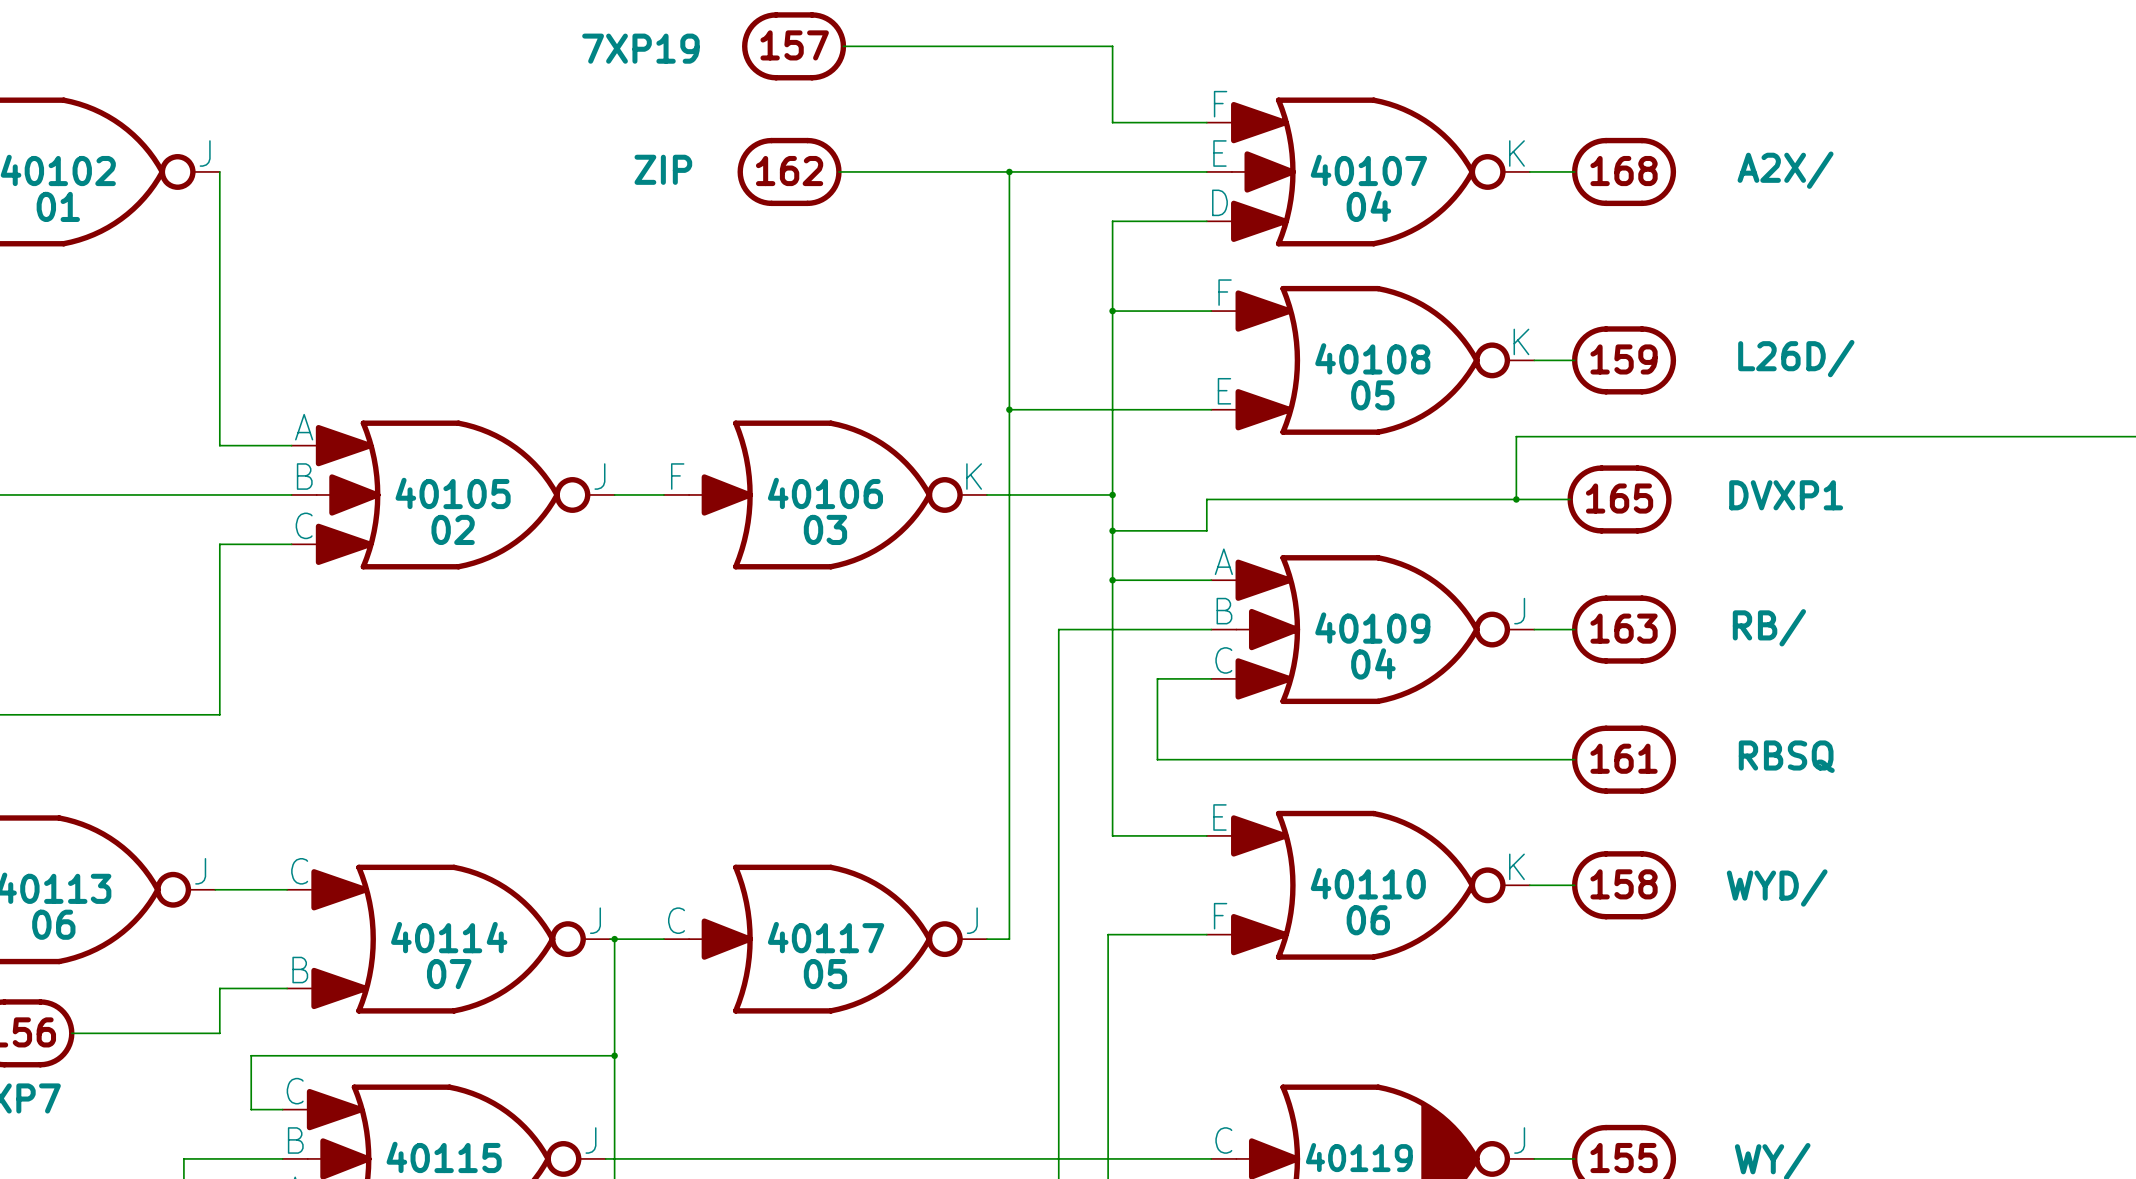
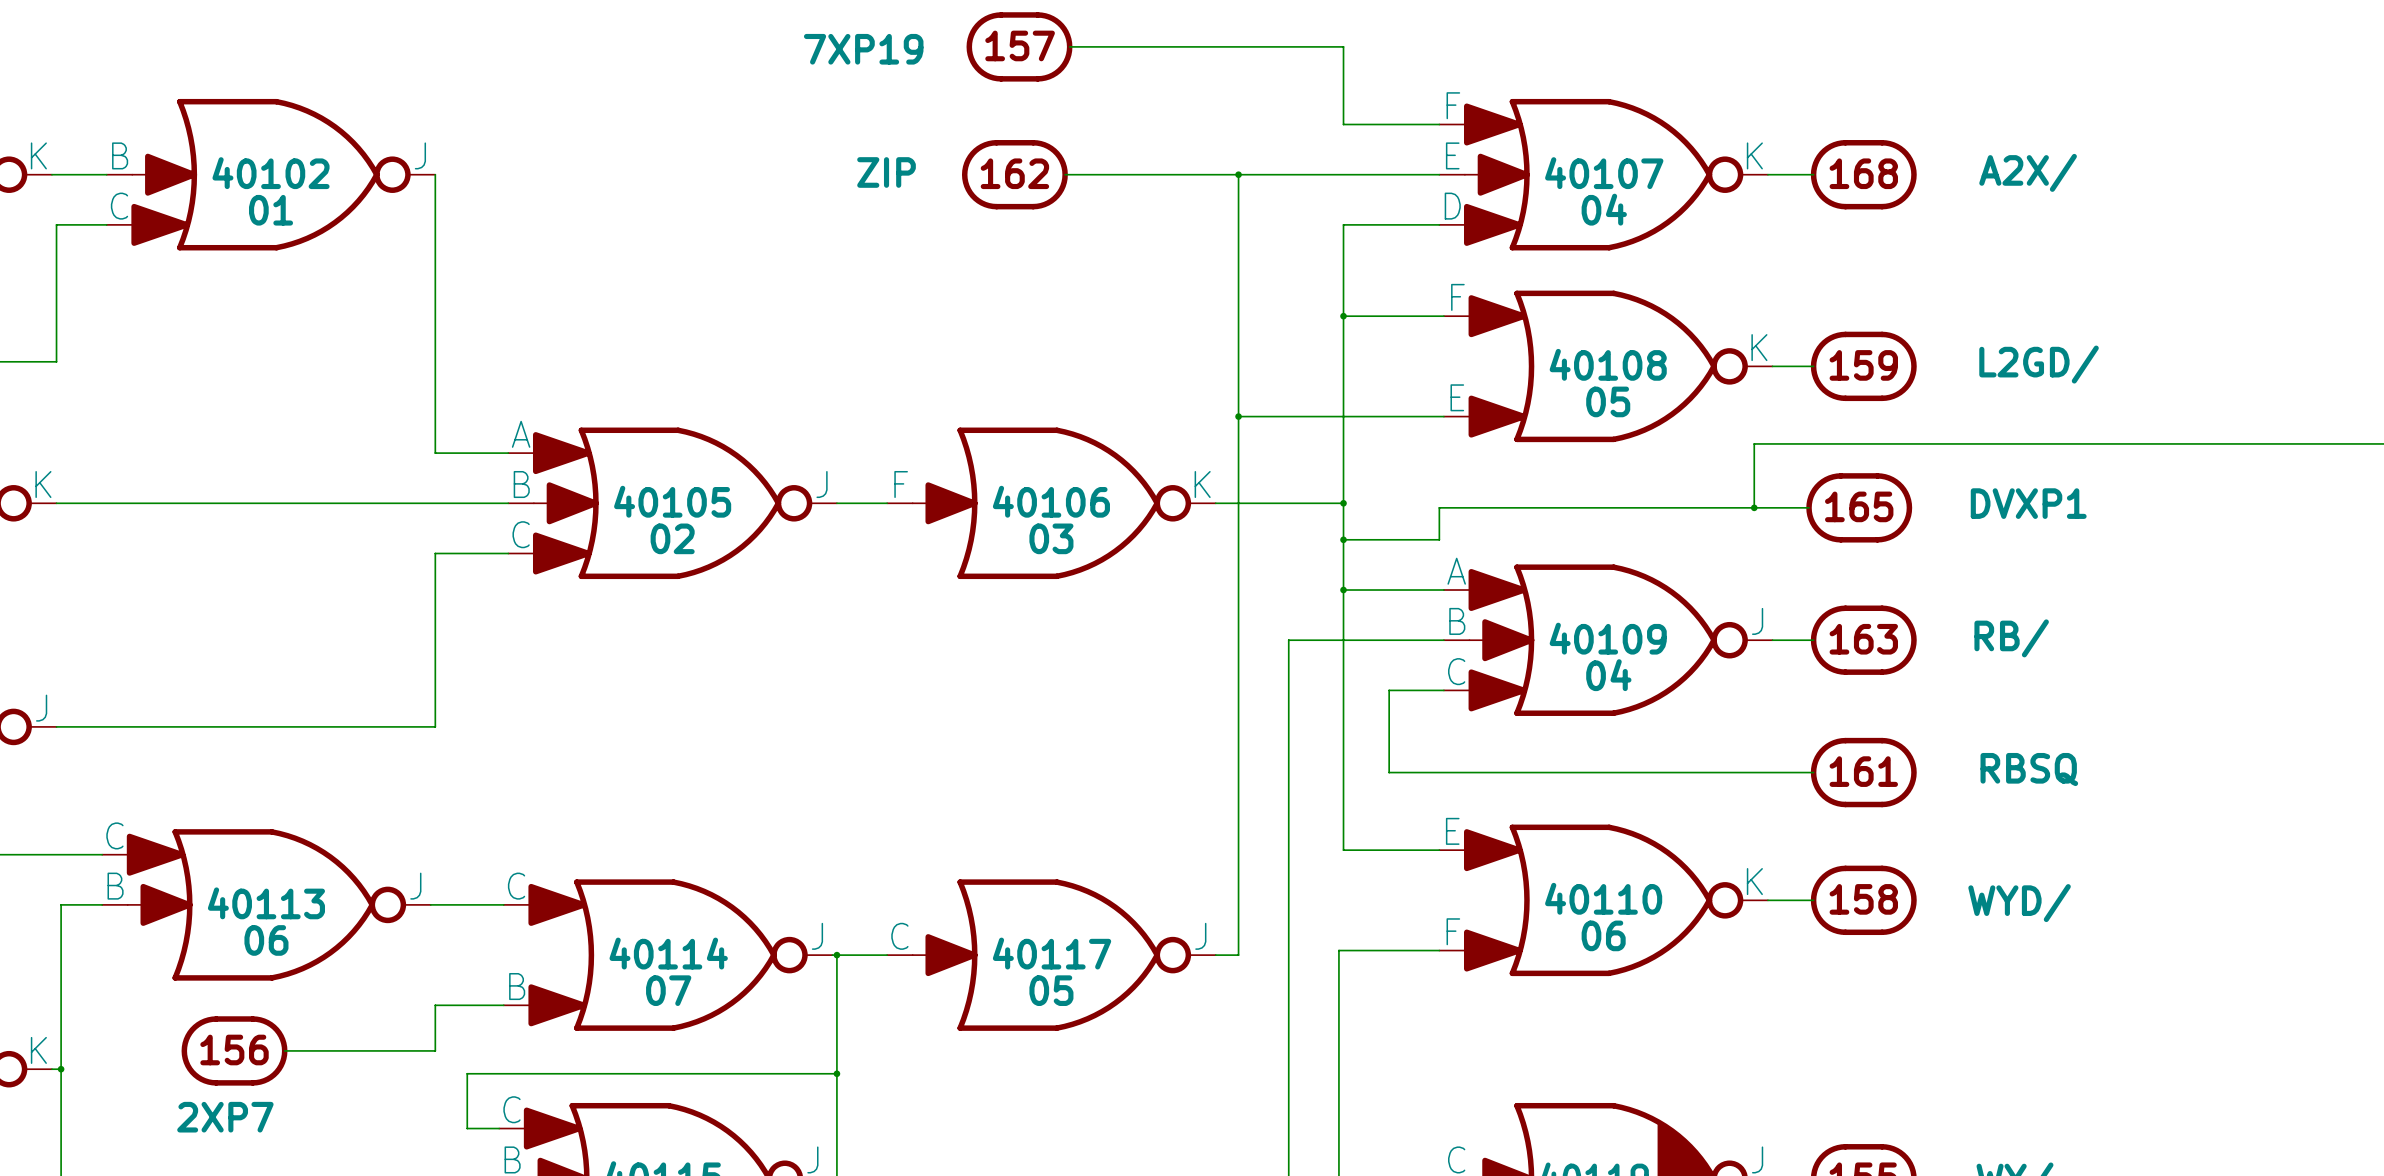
part text: L26D/ (1796, 358) -> L2GD/ (2039, 364)

